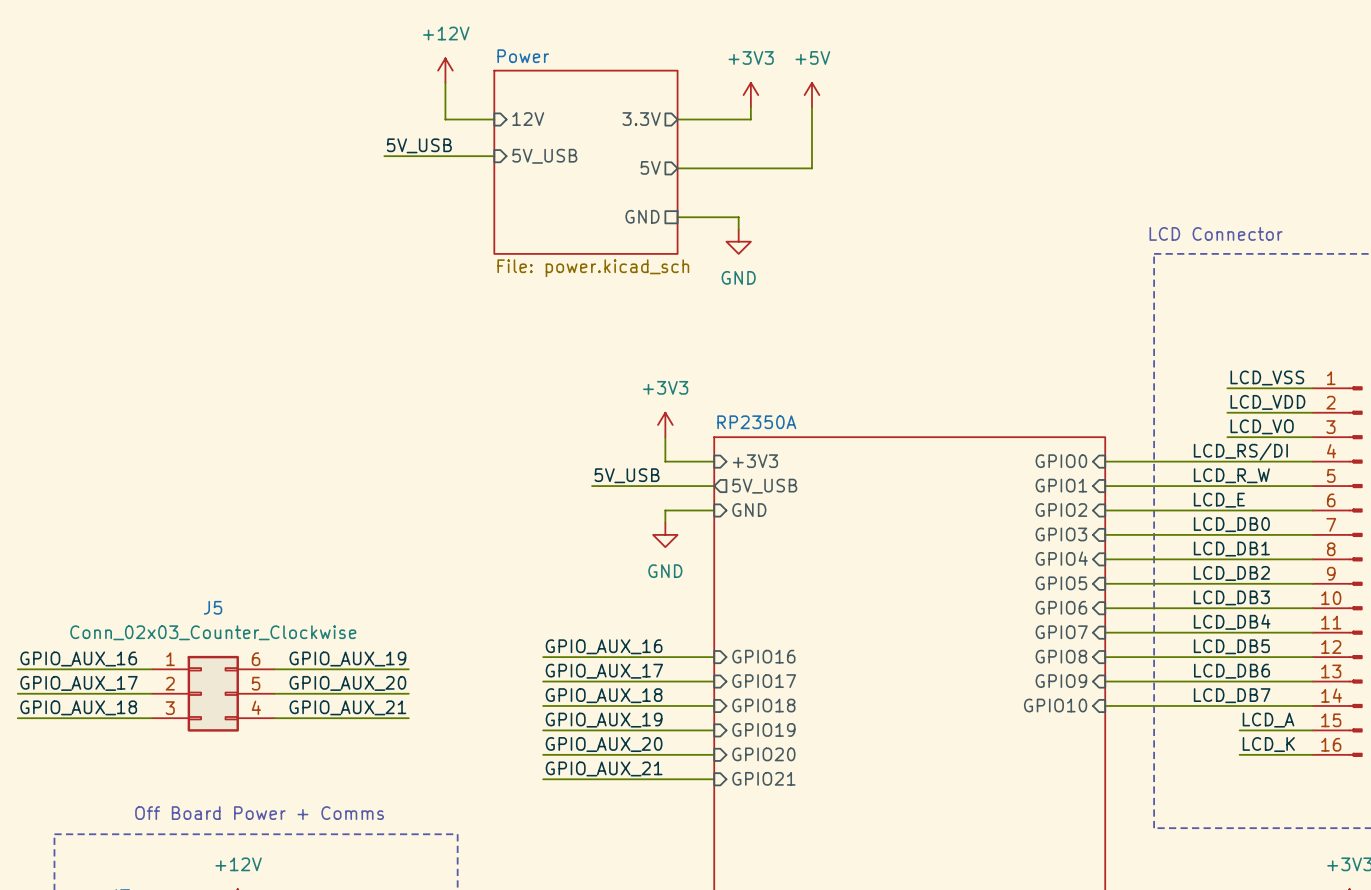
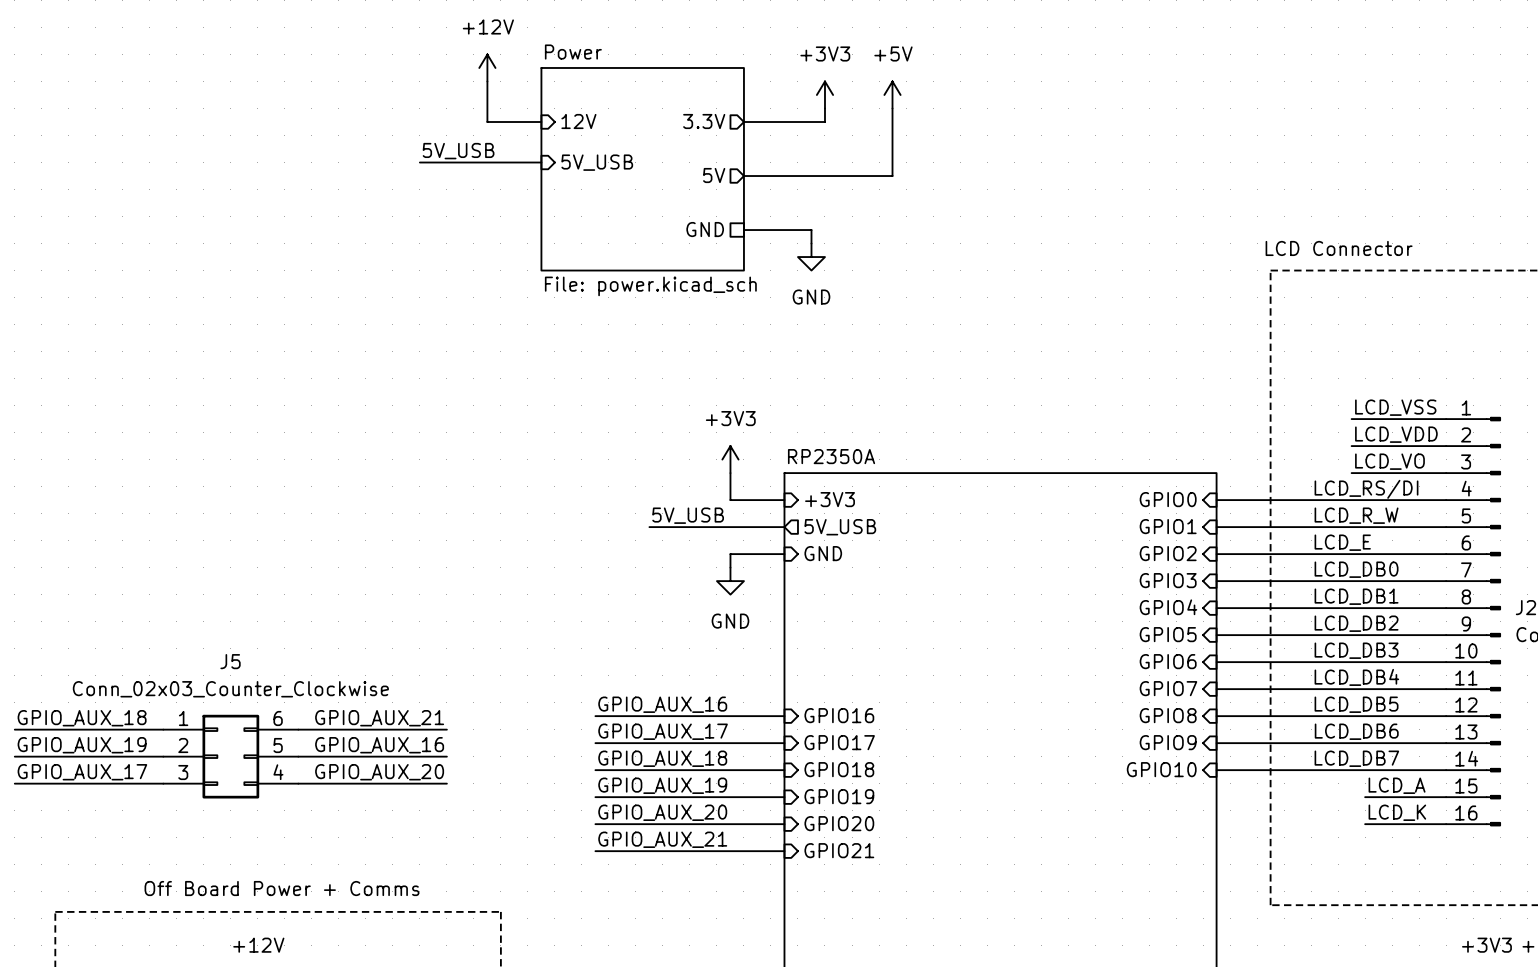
label: GPIO_AUX_16 (78, 659) -> GPIO_AUX_18 (82, 718)
label: GPIO_AUX_19 (347, 659) -> GPIO_AUX_21 (379, 718)
label: GPIO_AUX_17 (78, 683) -> GPIO_AUX_19 (82, 745)
label: GPIO_AUX_20 (347, 683) -> GPIO_AUX_16 (379, 745)
label: GPIO_AUX_18 (78, 707) -> GPIO_AUX_17 (82, 772)
label: GPIO_AUX_21 (347, 707) -> GPIO_AUX_20 (379, 772)

